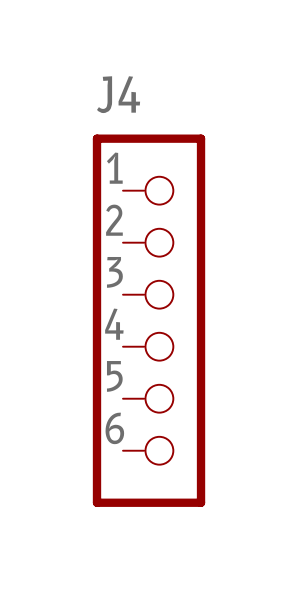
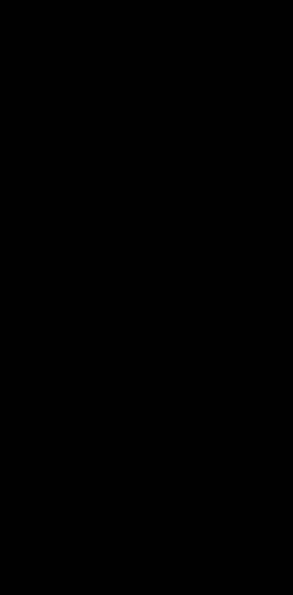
J4: (149, 320) -> none

